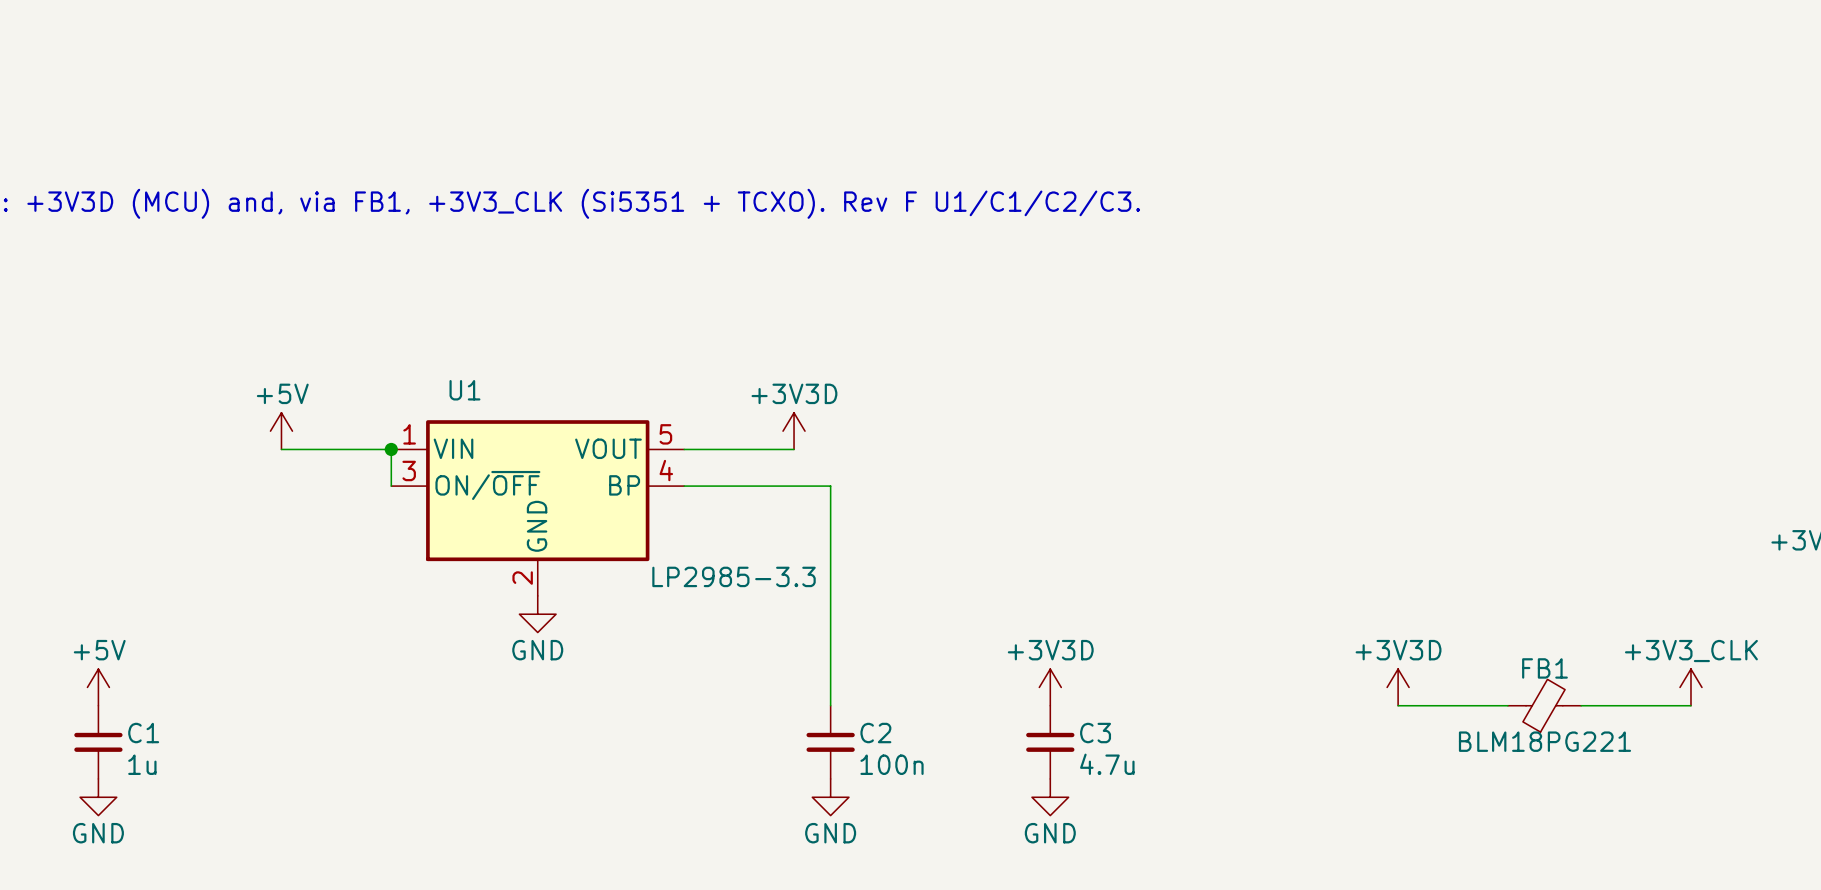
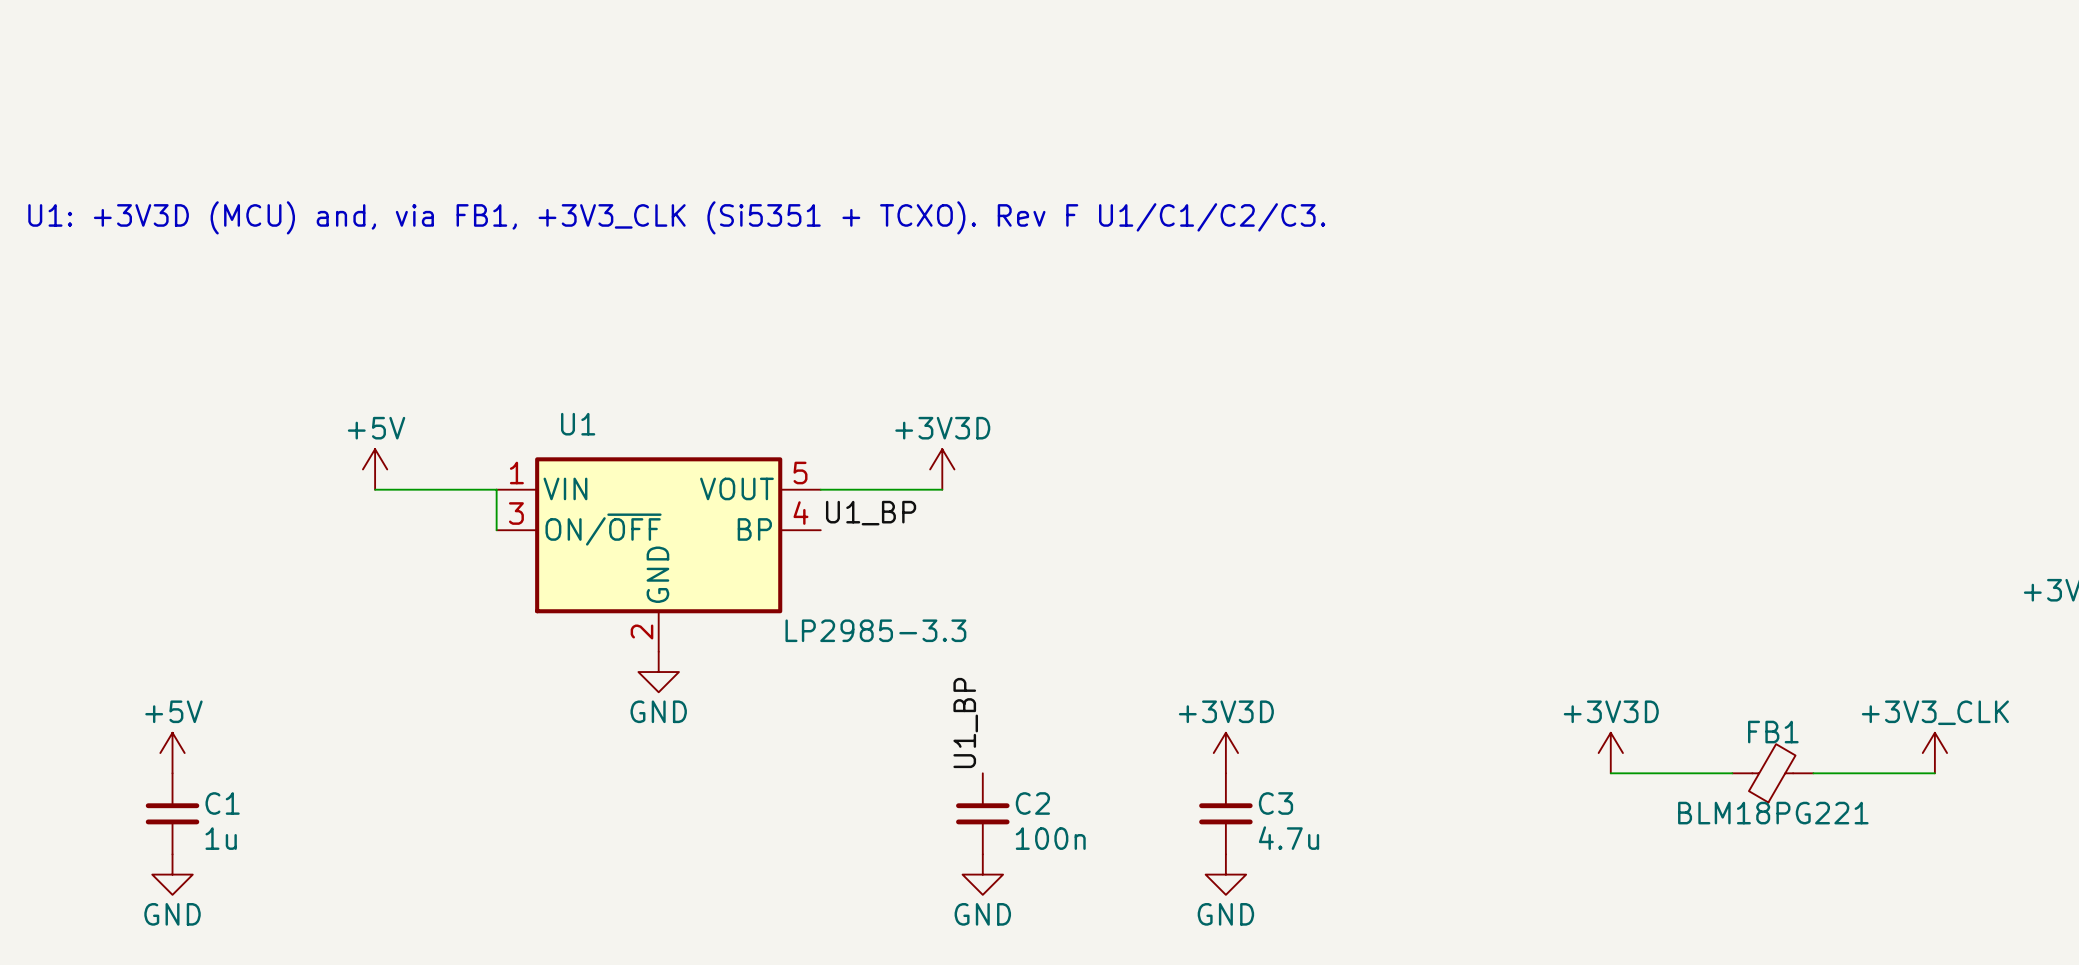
junction: (391, 449) -> none
label: none -> U1_BP (871, 513)
wire: (684, 486) (830, 486) (830, 705) -> none
label: none -> U1_BP (965, 722)

